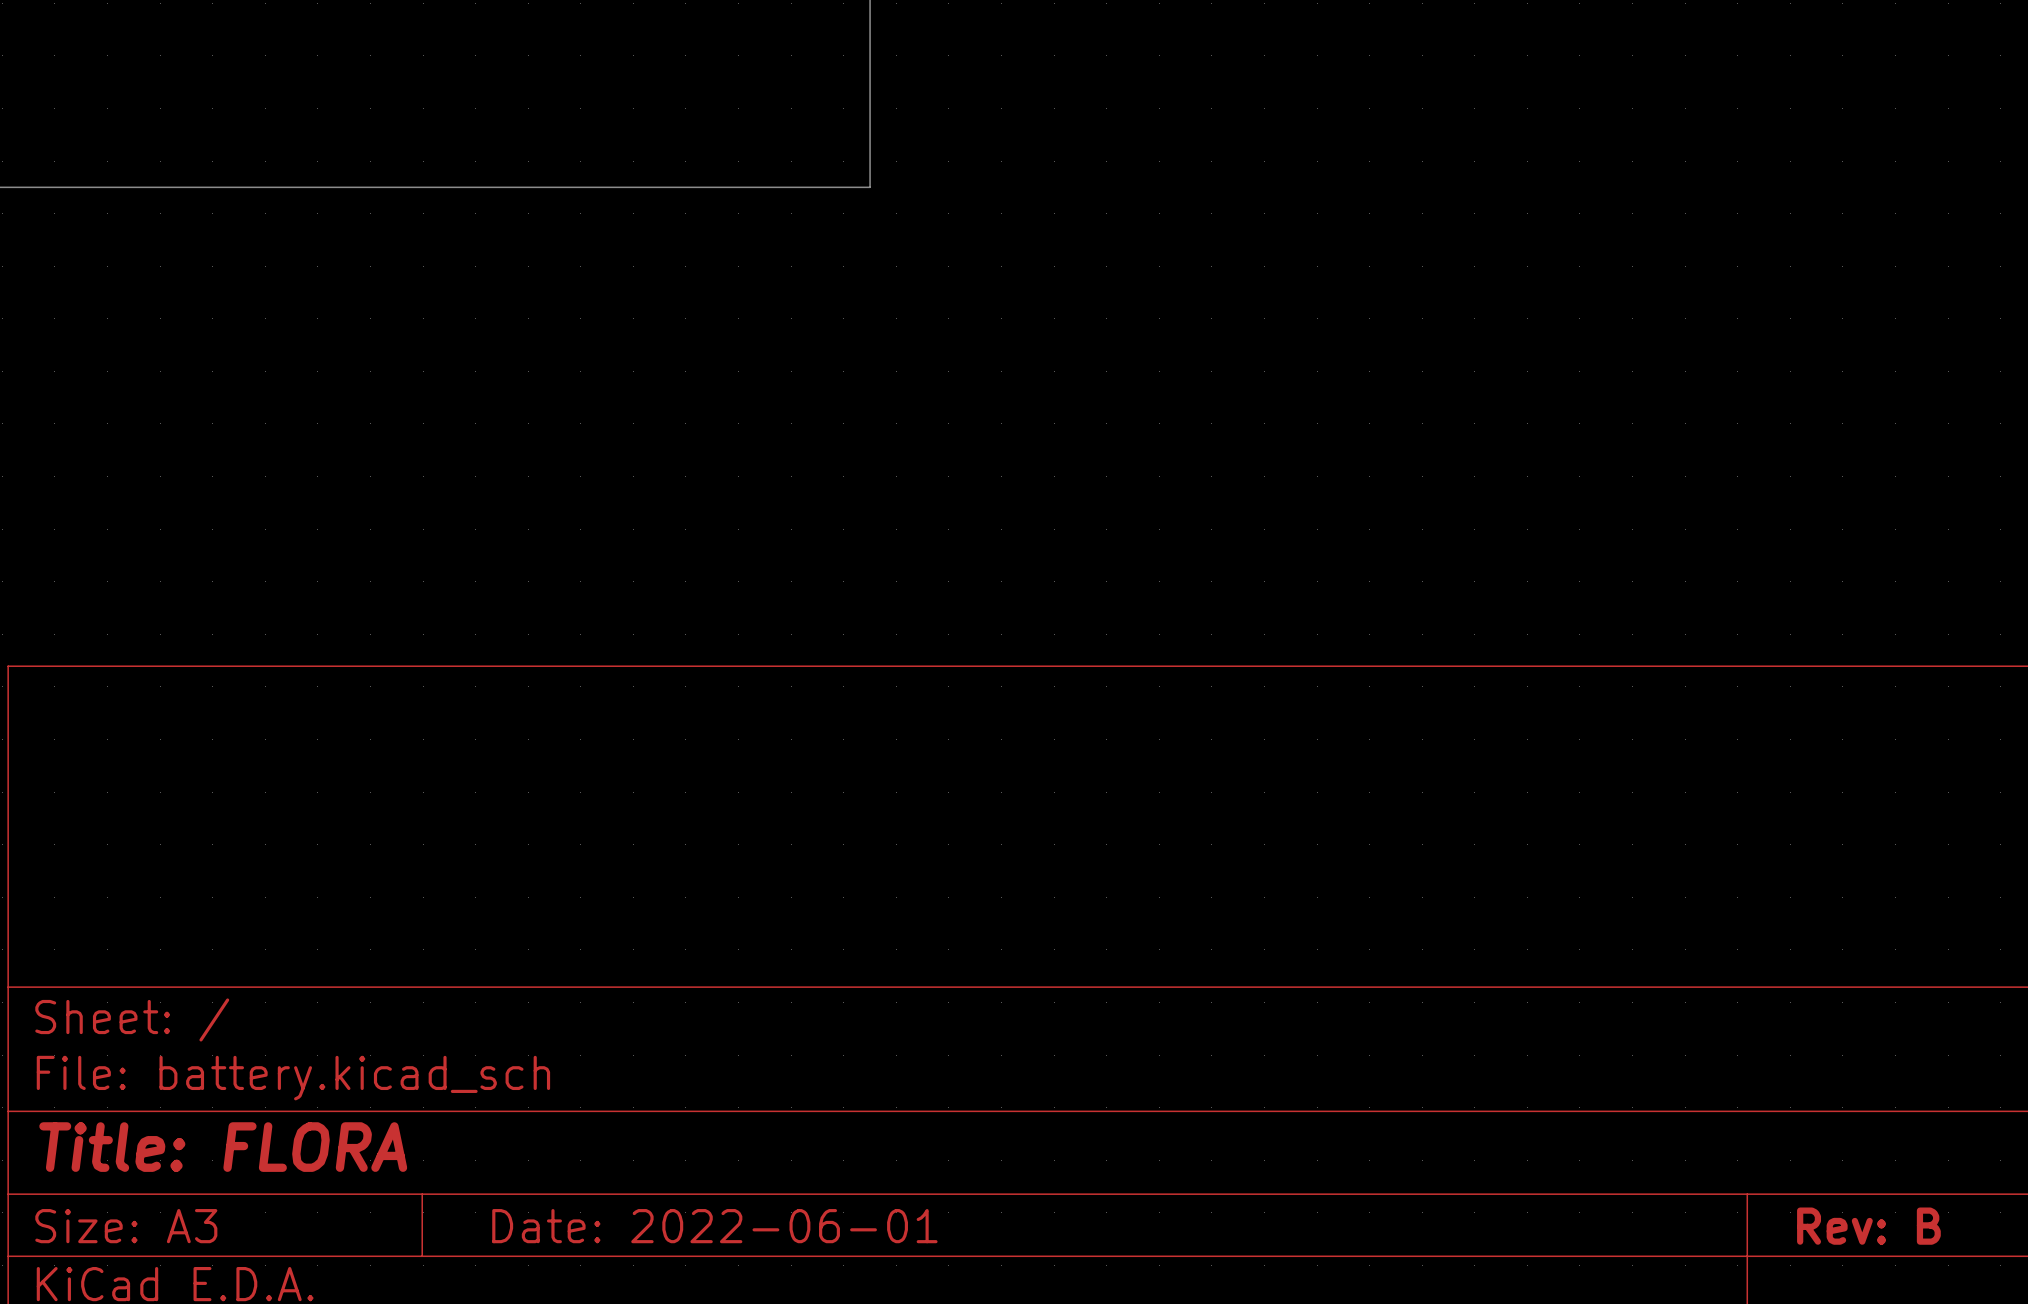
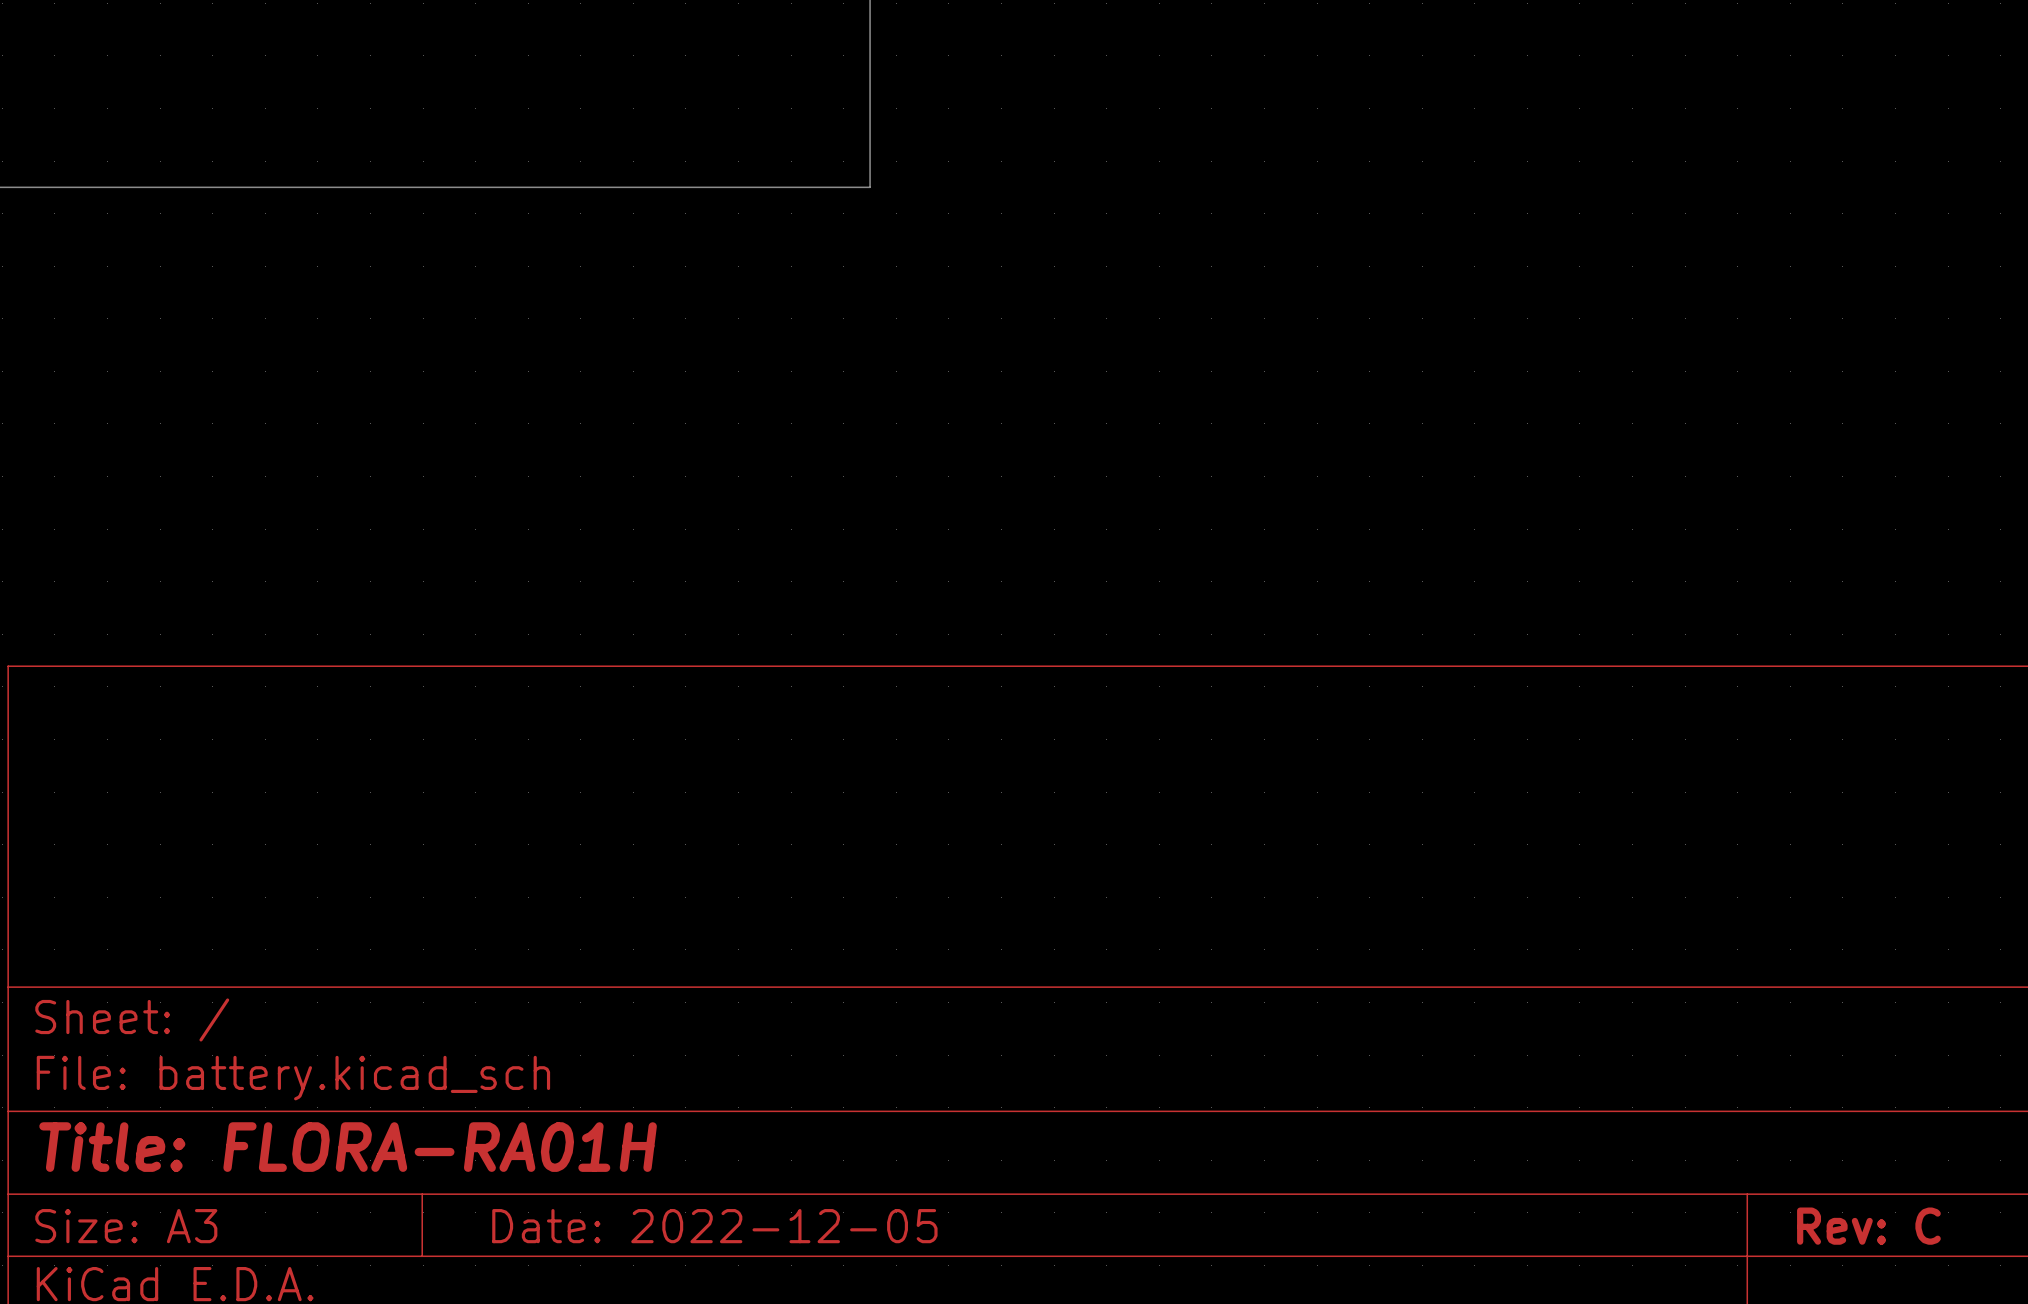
title block: Title: FLORA (223, 1147) -> Title: FLORA-RA01H (348, 1147)
title block: Date: 2022-06-01 (714, 1226) -> Date: 2022-12-05 (714, 1226)
title block: Rev: B (1868, 1226) -> Rev: C (1868, 1226)

